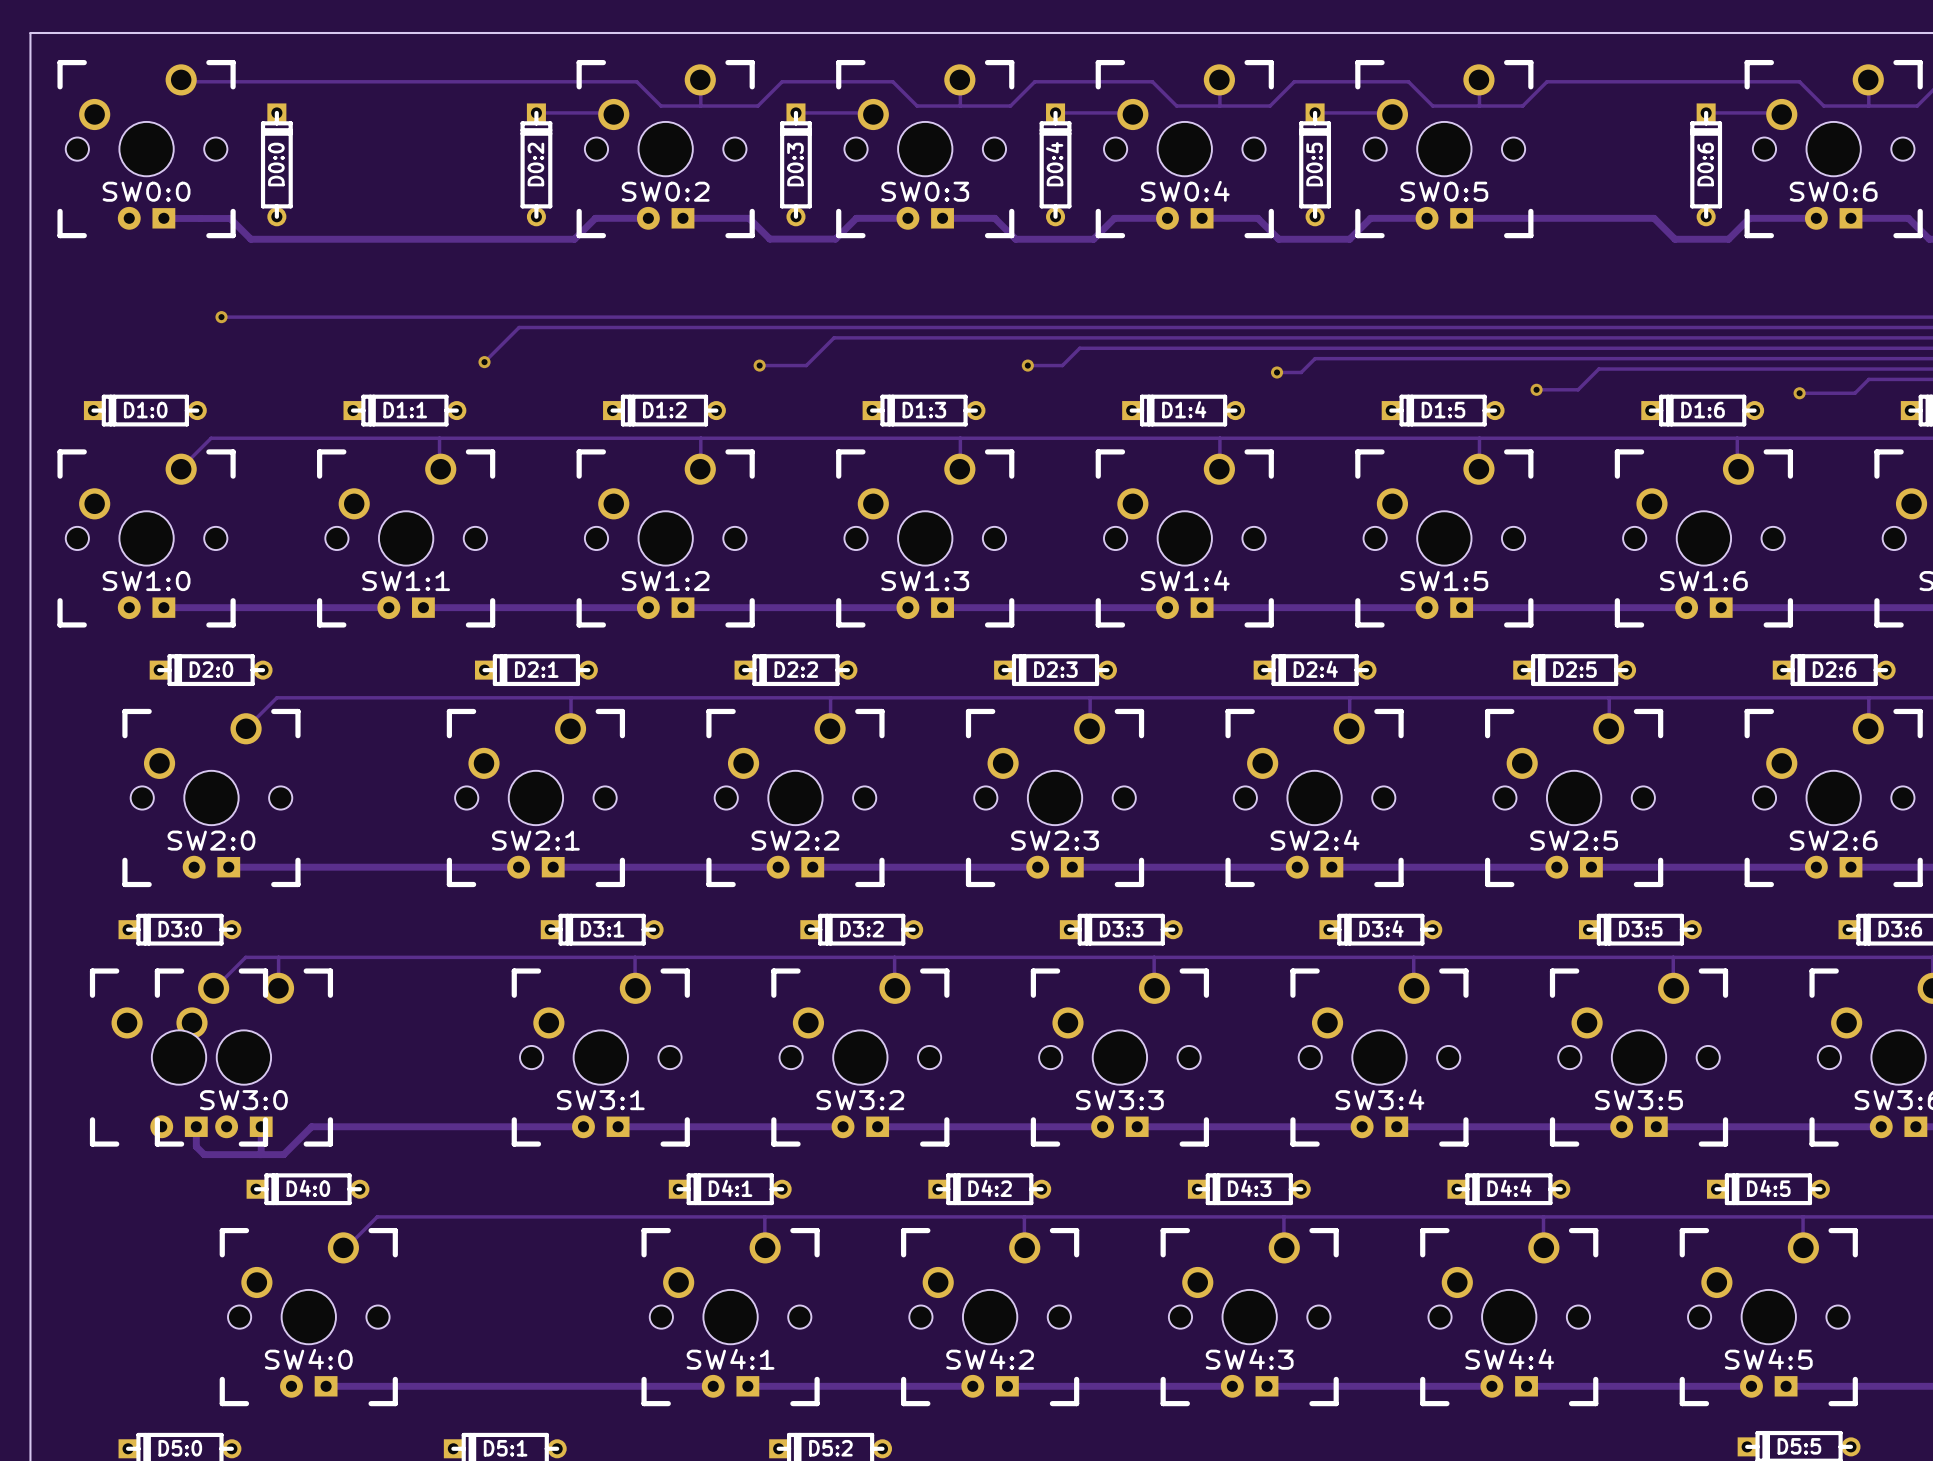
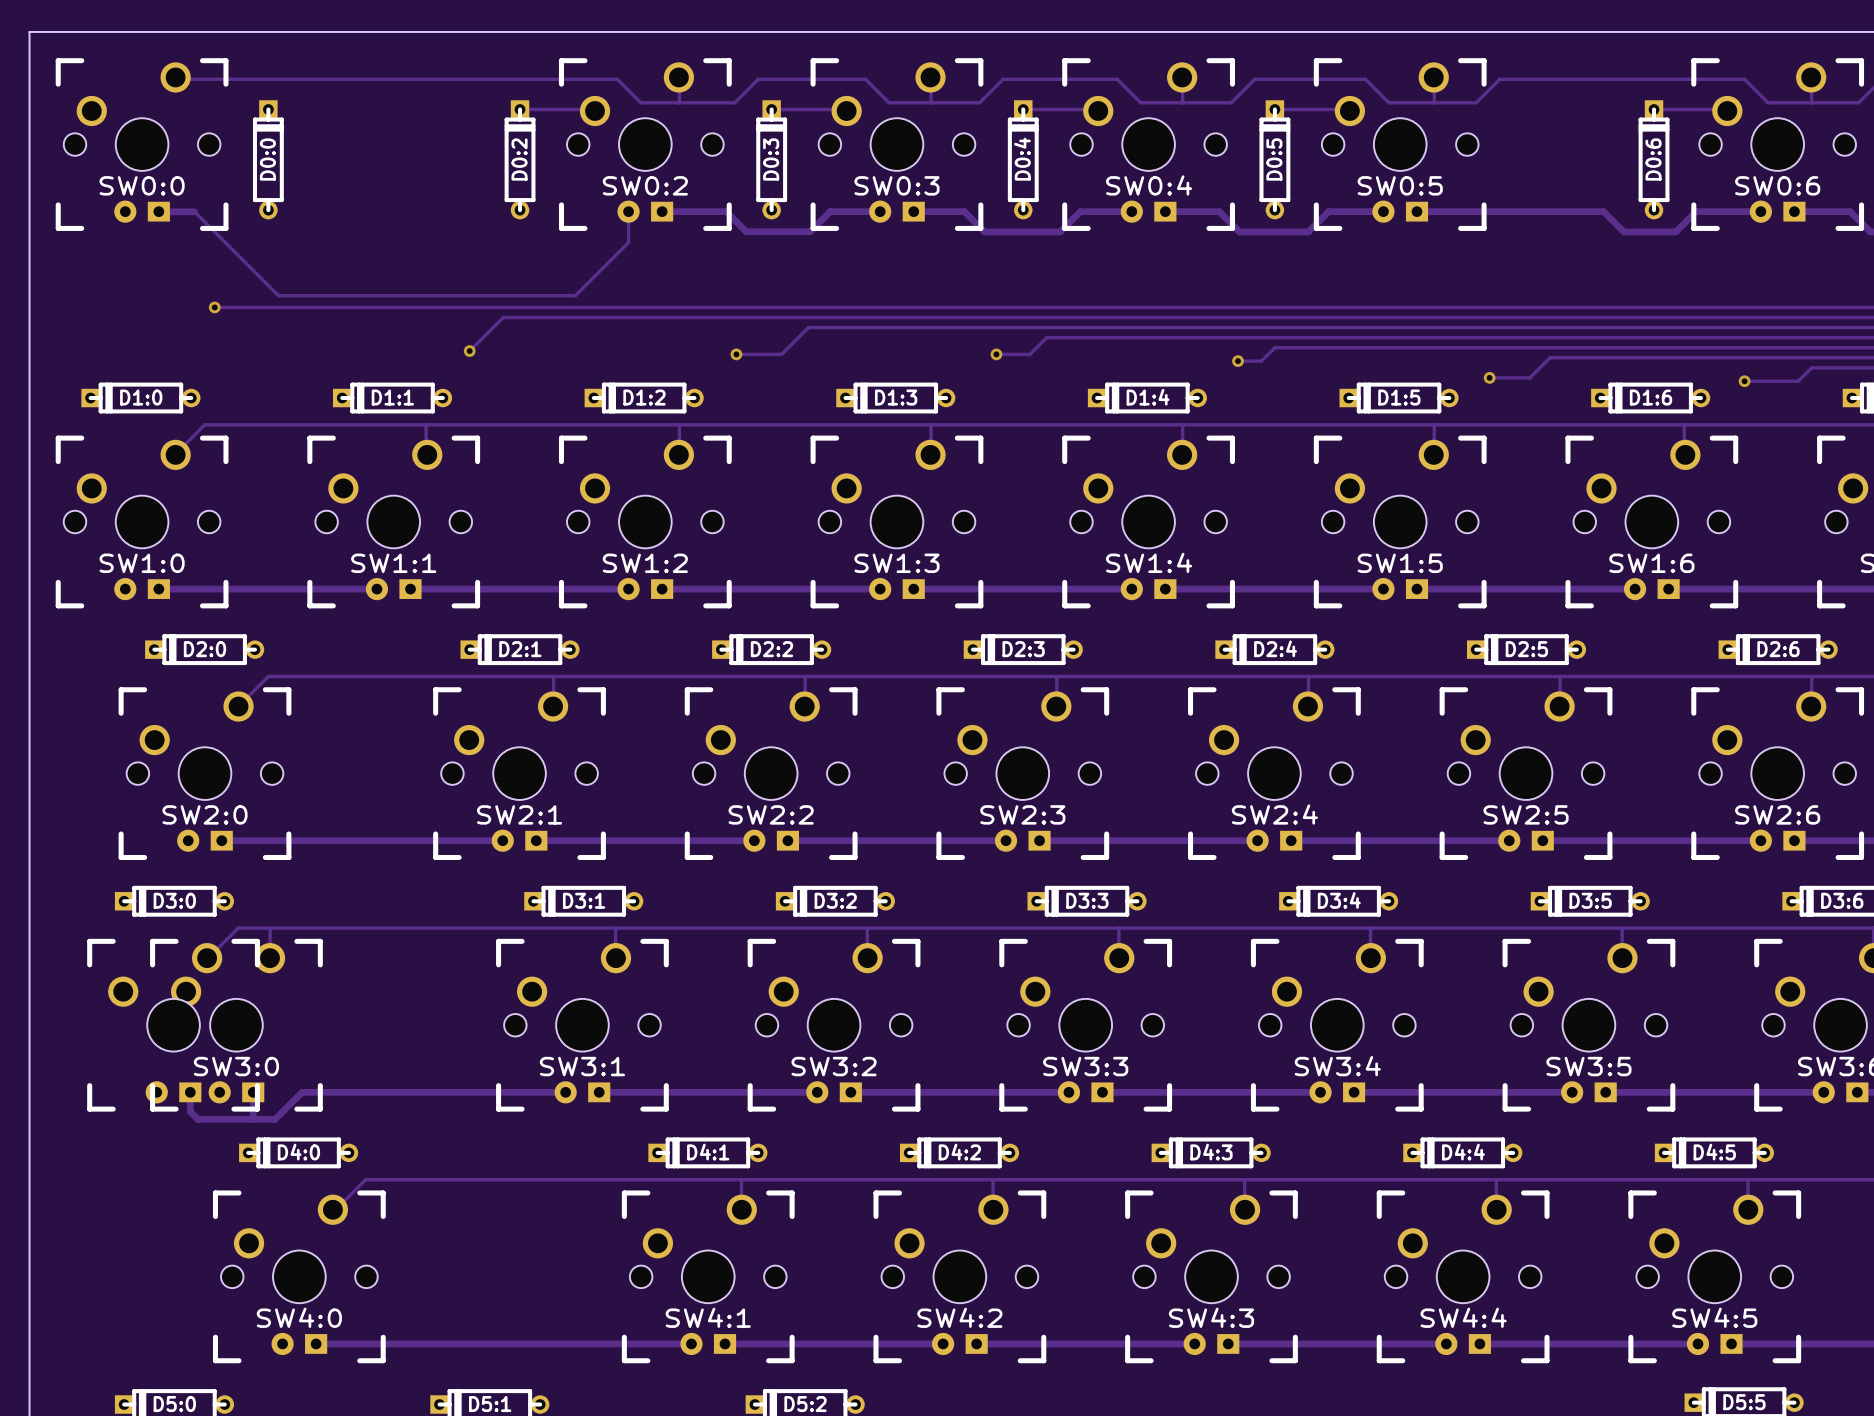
track: (648, 218) (595, 218) (574, 239) (250, 239) (230, 218) (200, 218) -> (628, 211) (628, 242) (575, 295) (278, 295) (194, 211)

